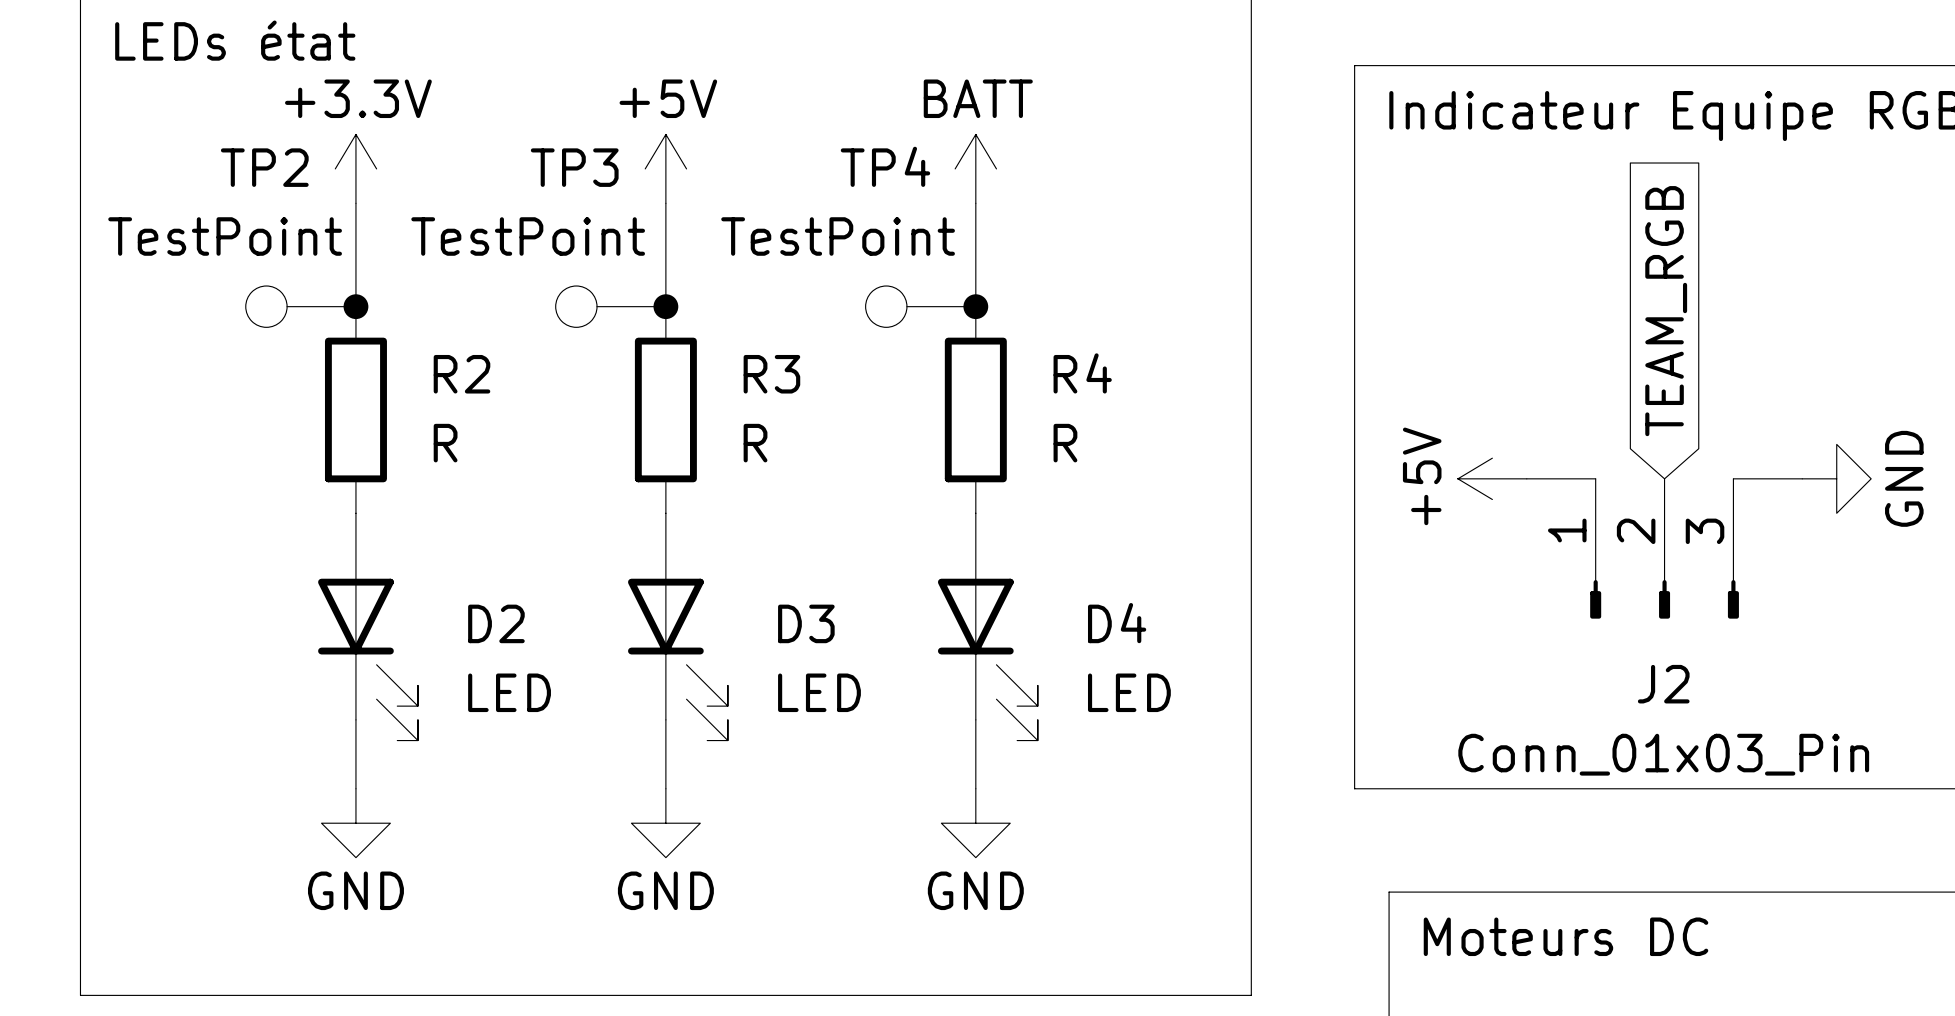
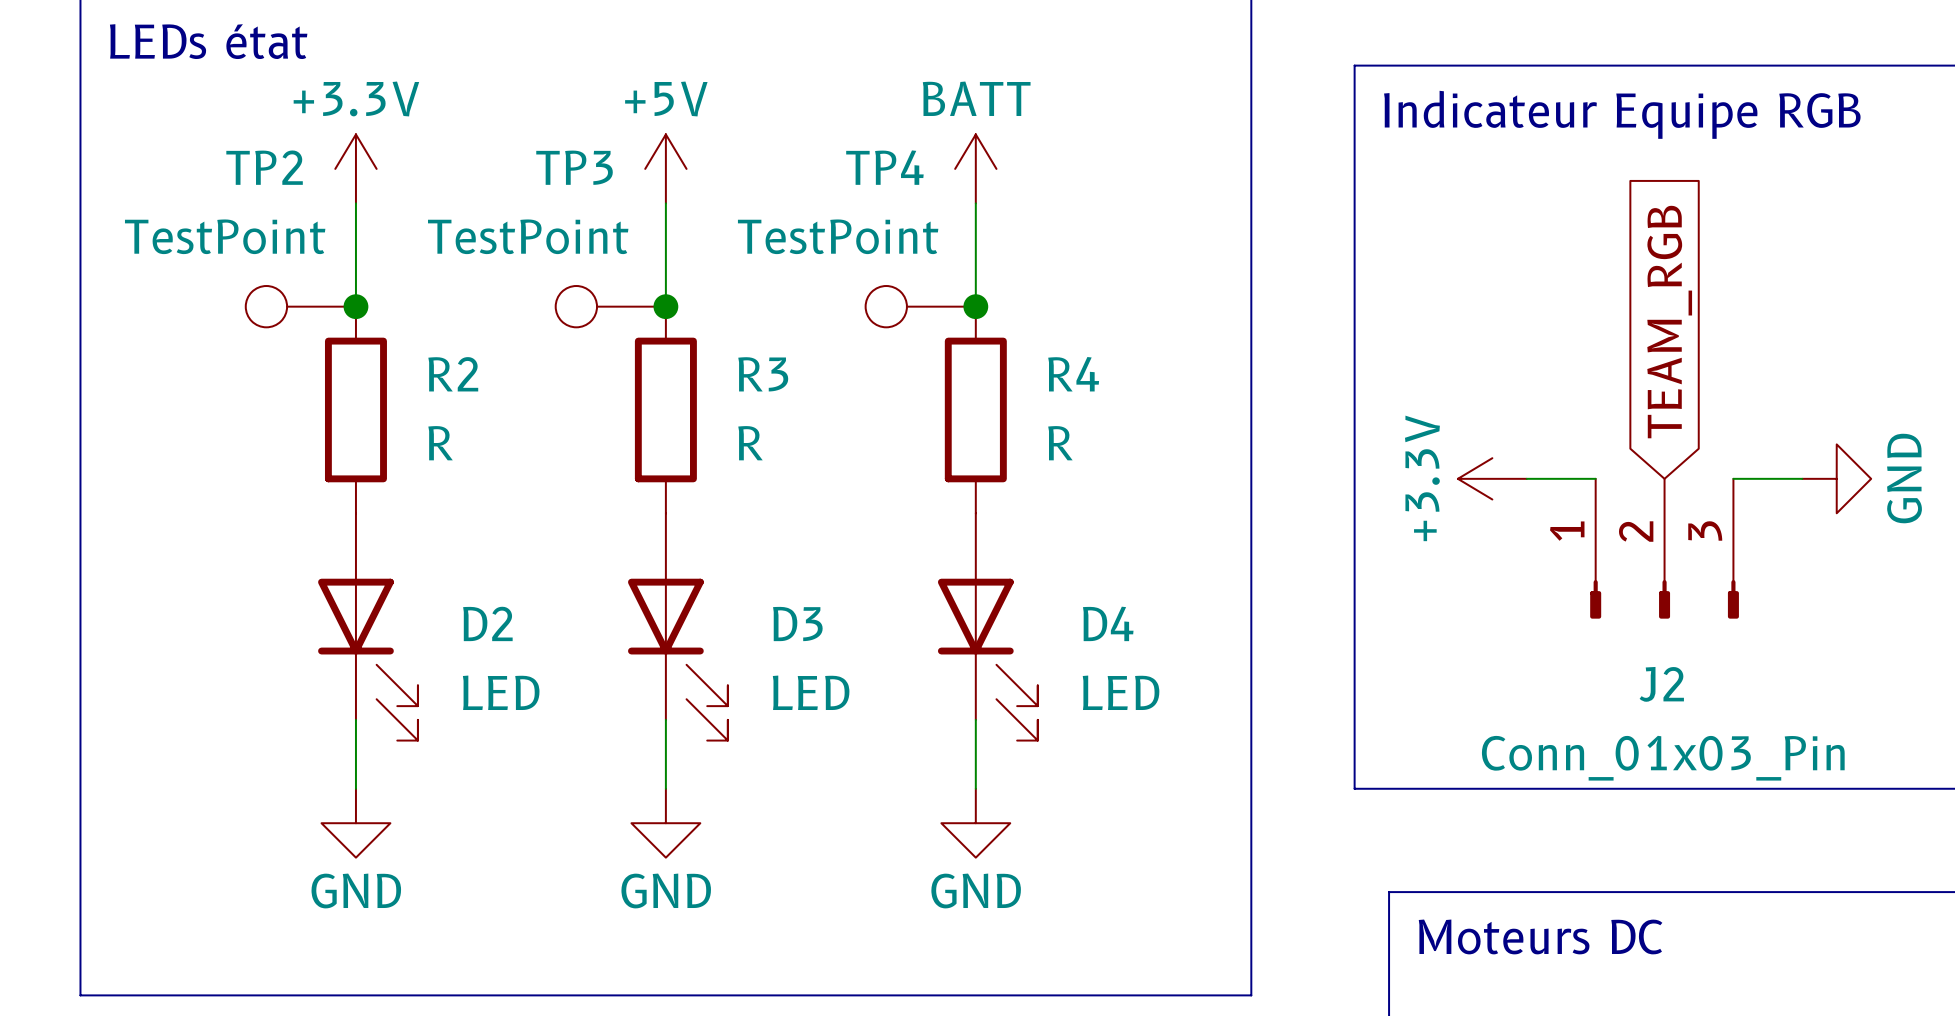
power symbol: +5V (1492, 478) -> +3.3V (1492, 478)

